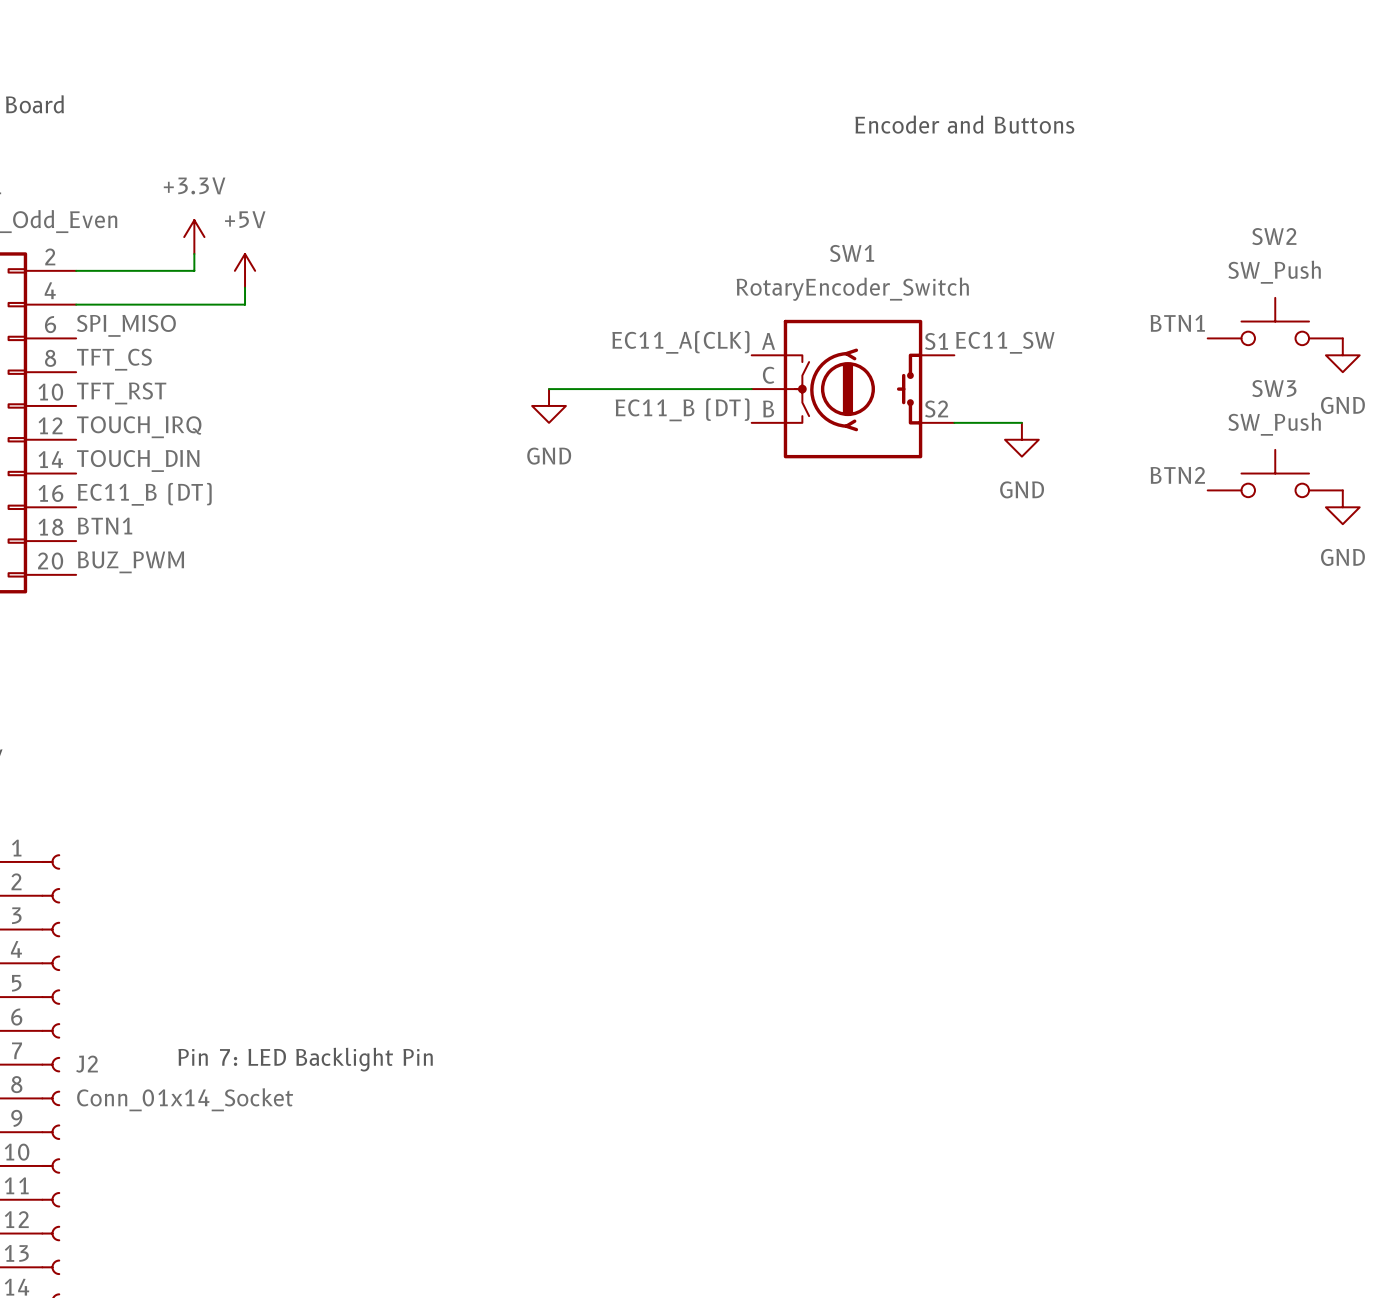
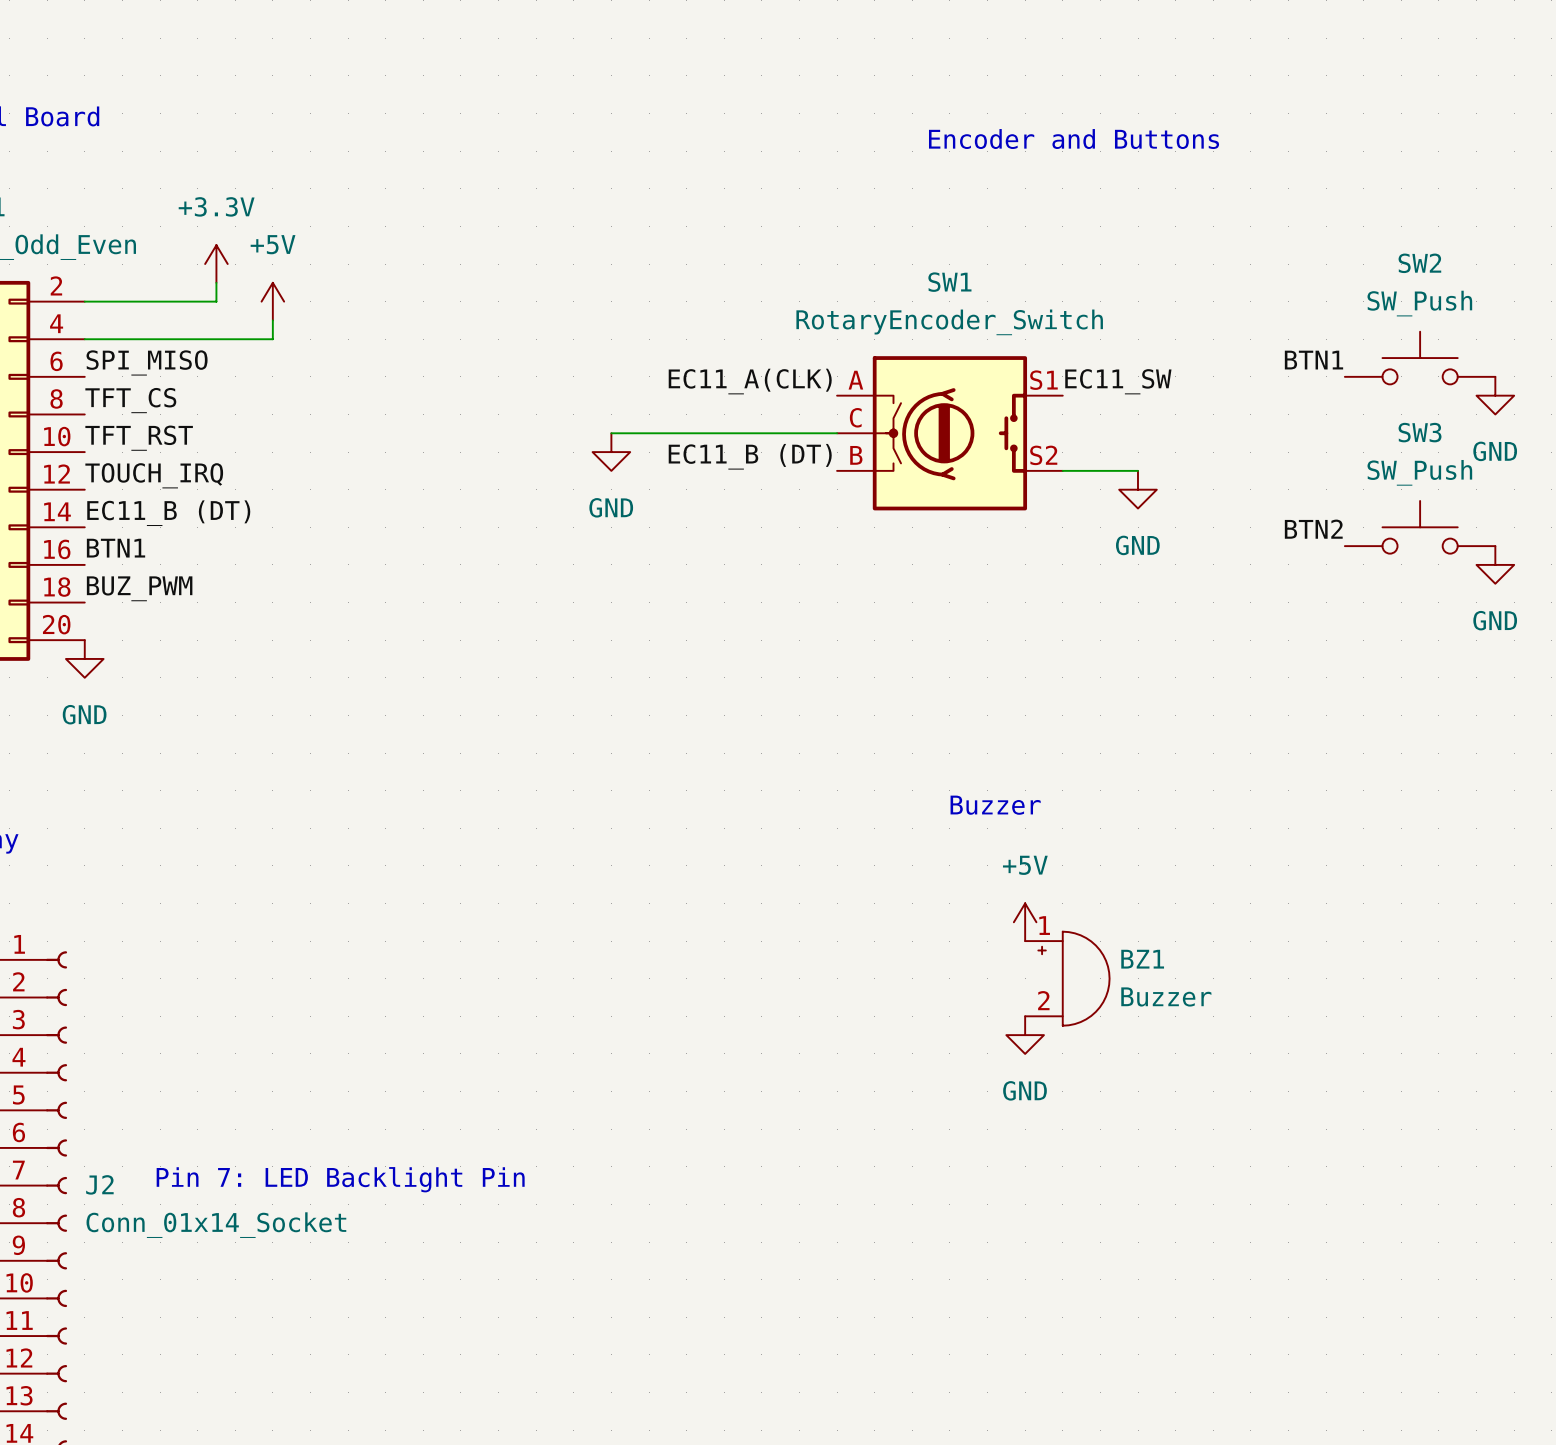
label: TOUCH_DIN (138, 460) -> EC11_B (DT) (168, 513)
label: EC11_B (DT) (144, 494) -> BTN1 (116, 548)
label: BTN1 (105, 526) -> BUZ_PWM (139, 588)
label: BUZ_PWM (130, 562) -> none
power symbol: none -> GND (84, 658)
text: none -> Buzzer (995, 805)
power symbol: none -> +5V (1025, 922)
BZ1: none -> Buzzer (1067, 978)
power symbol: none -> GND (1025, 1035)

